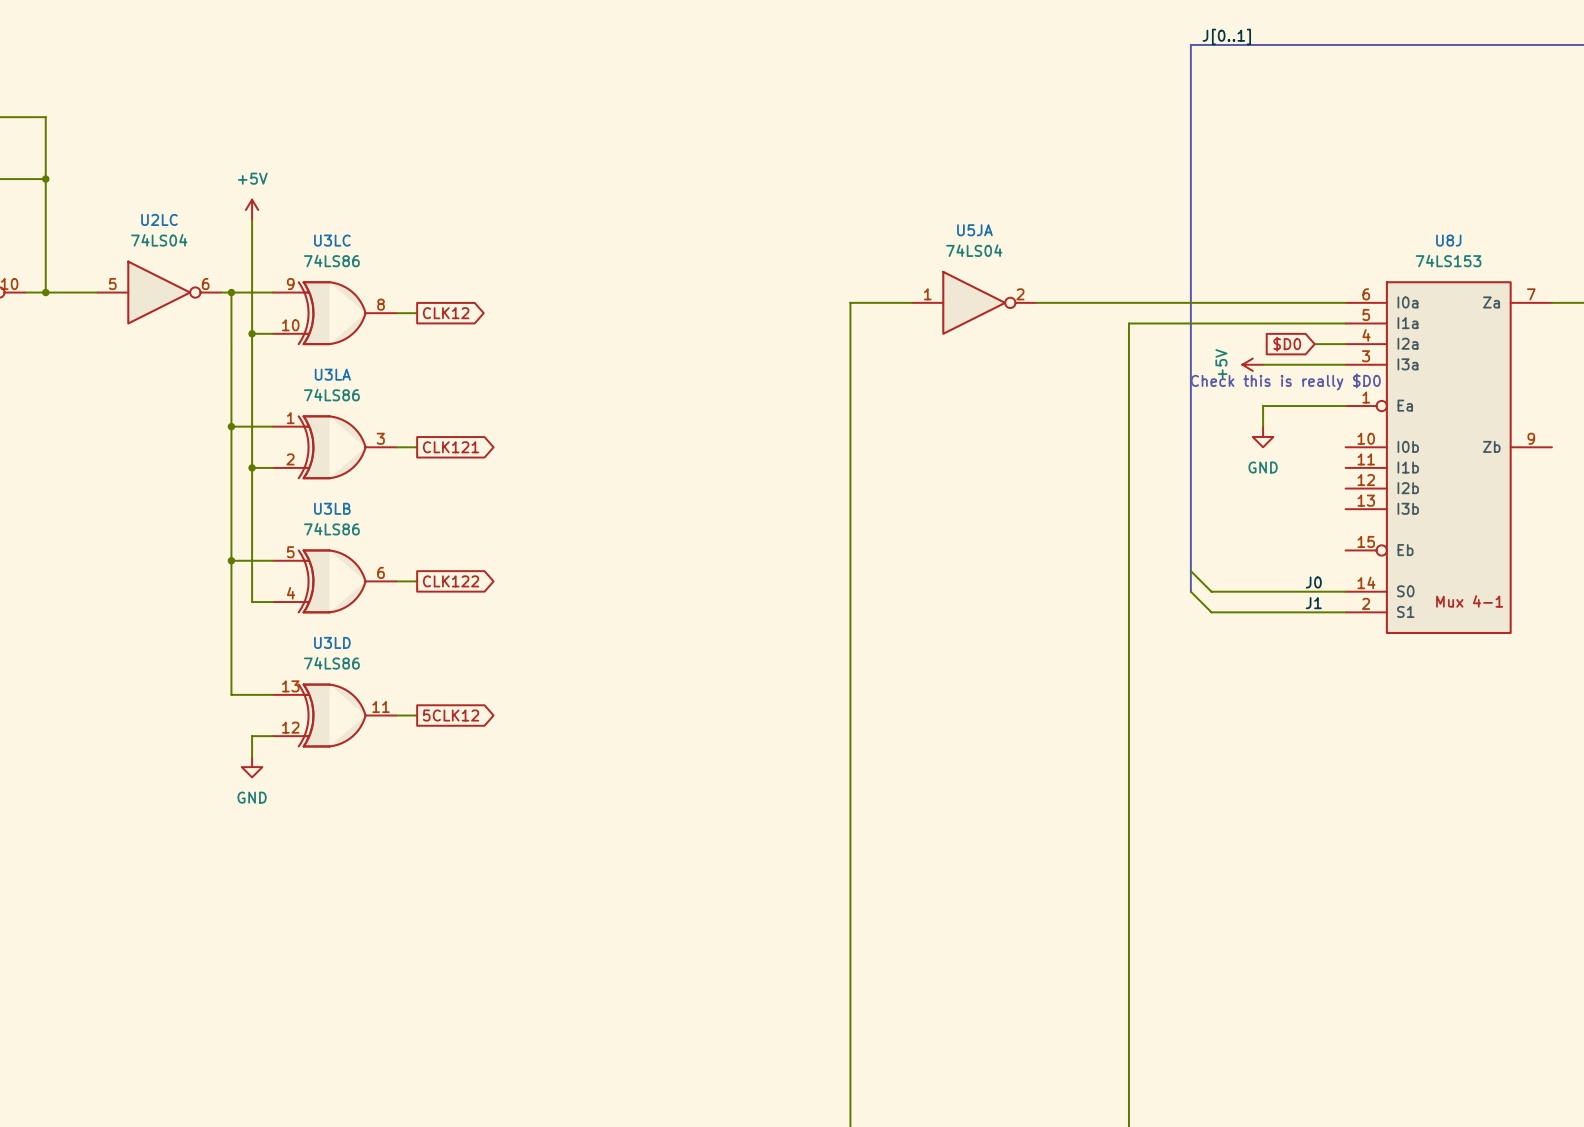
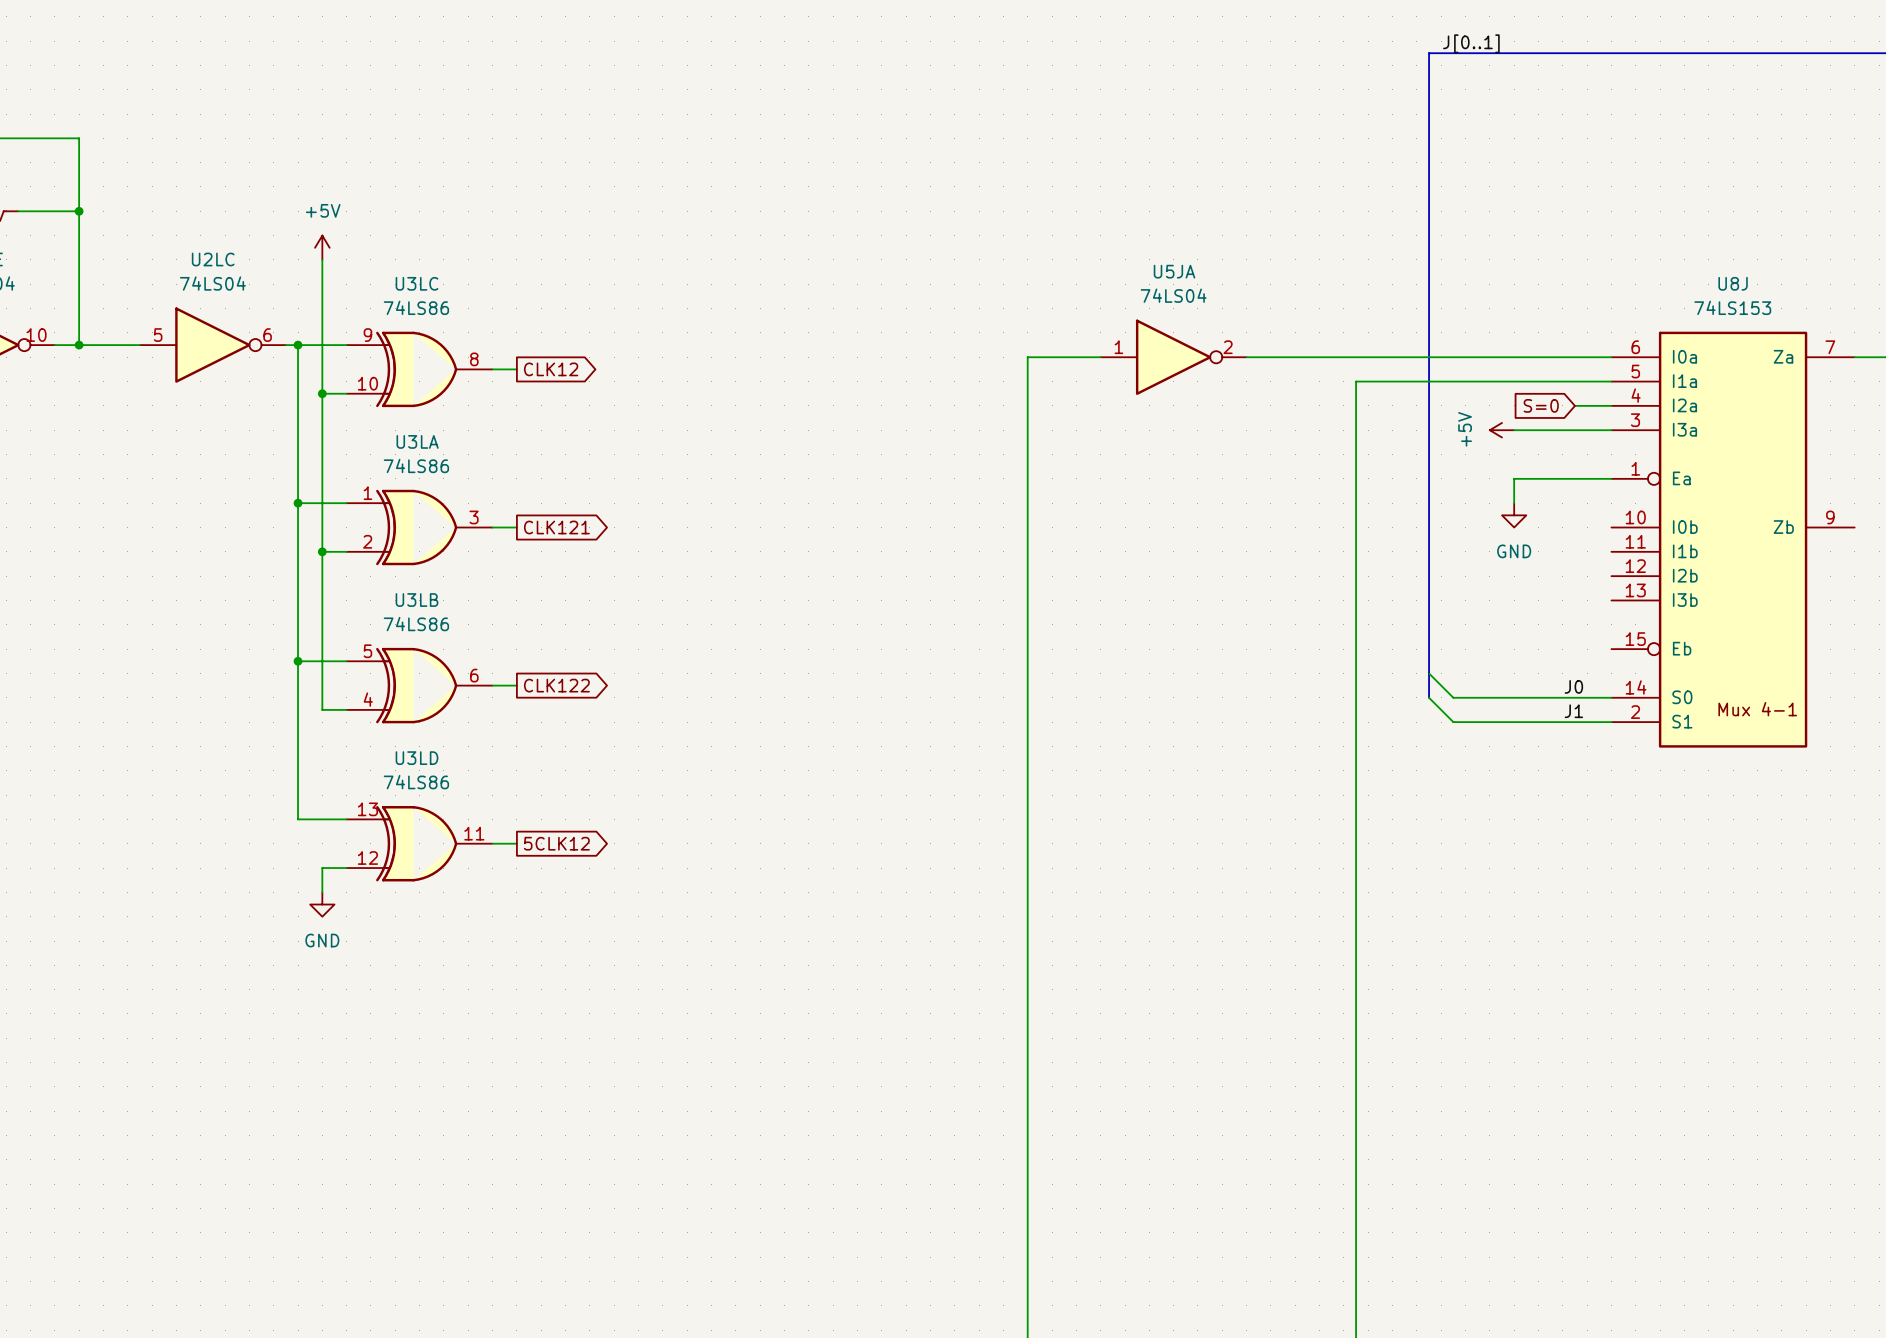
global label: $D0 (1287, 344) -> S=0 (1541, 405)
text: Check this is really $D0 (1285, 381) -> none

